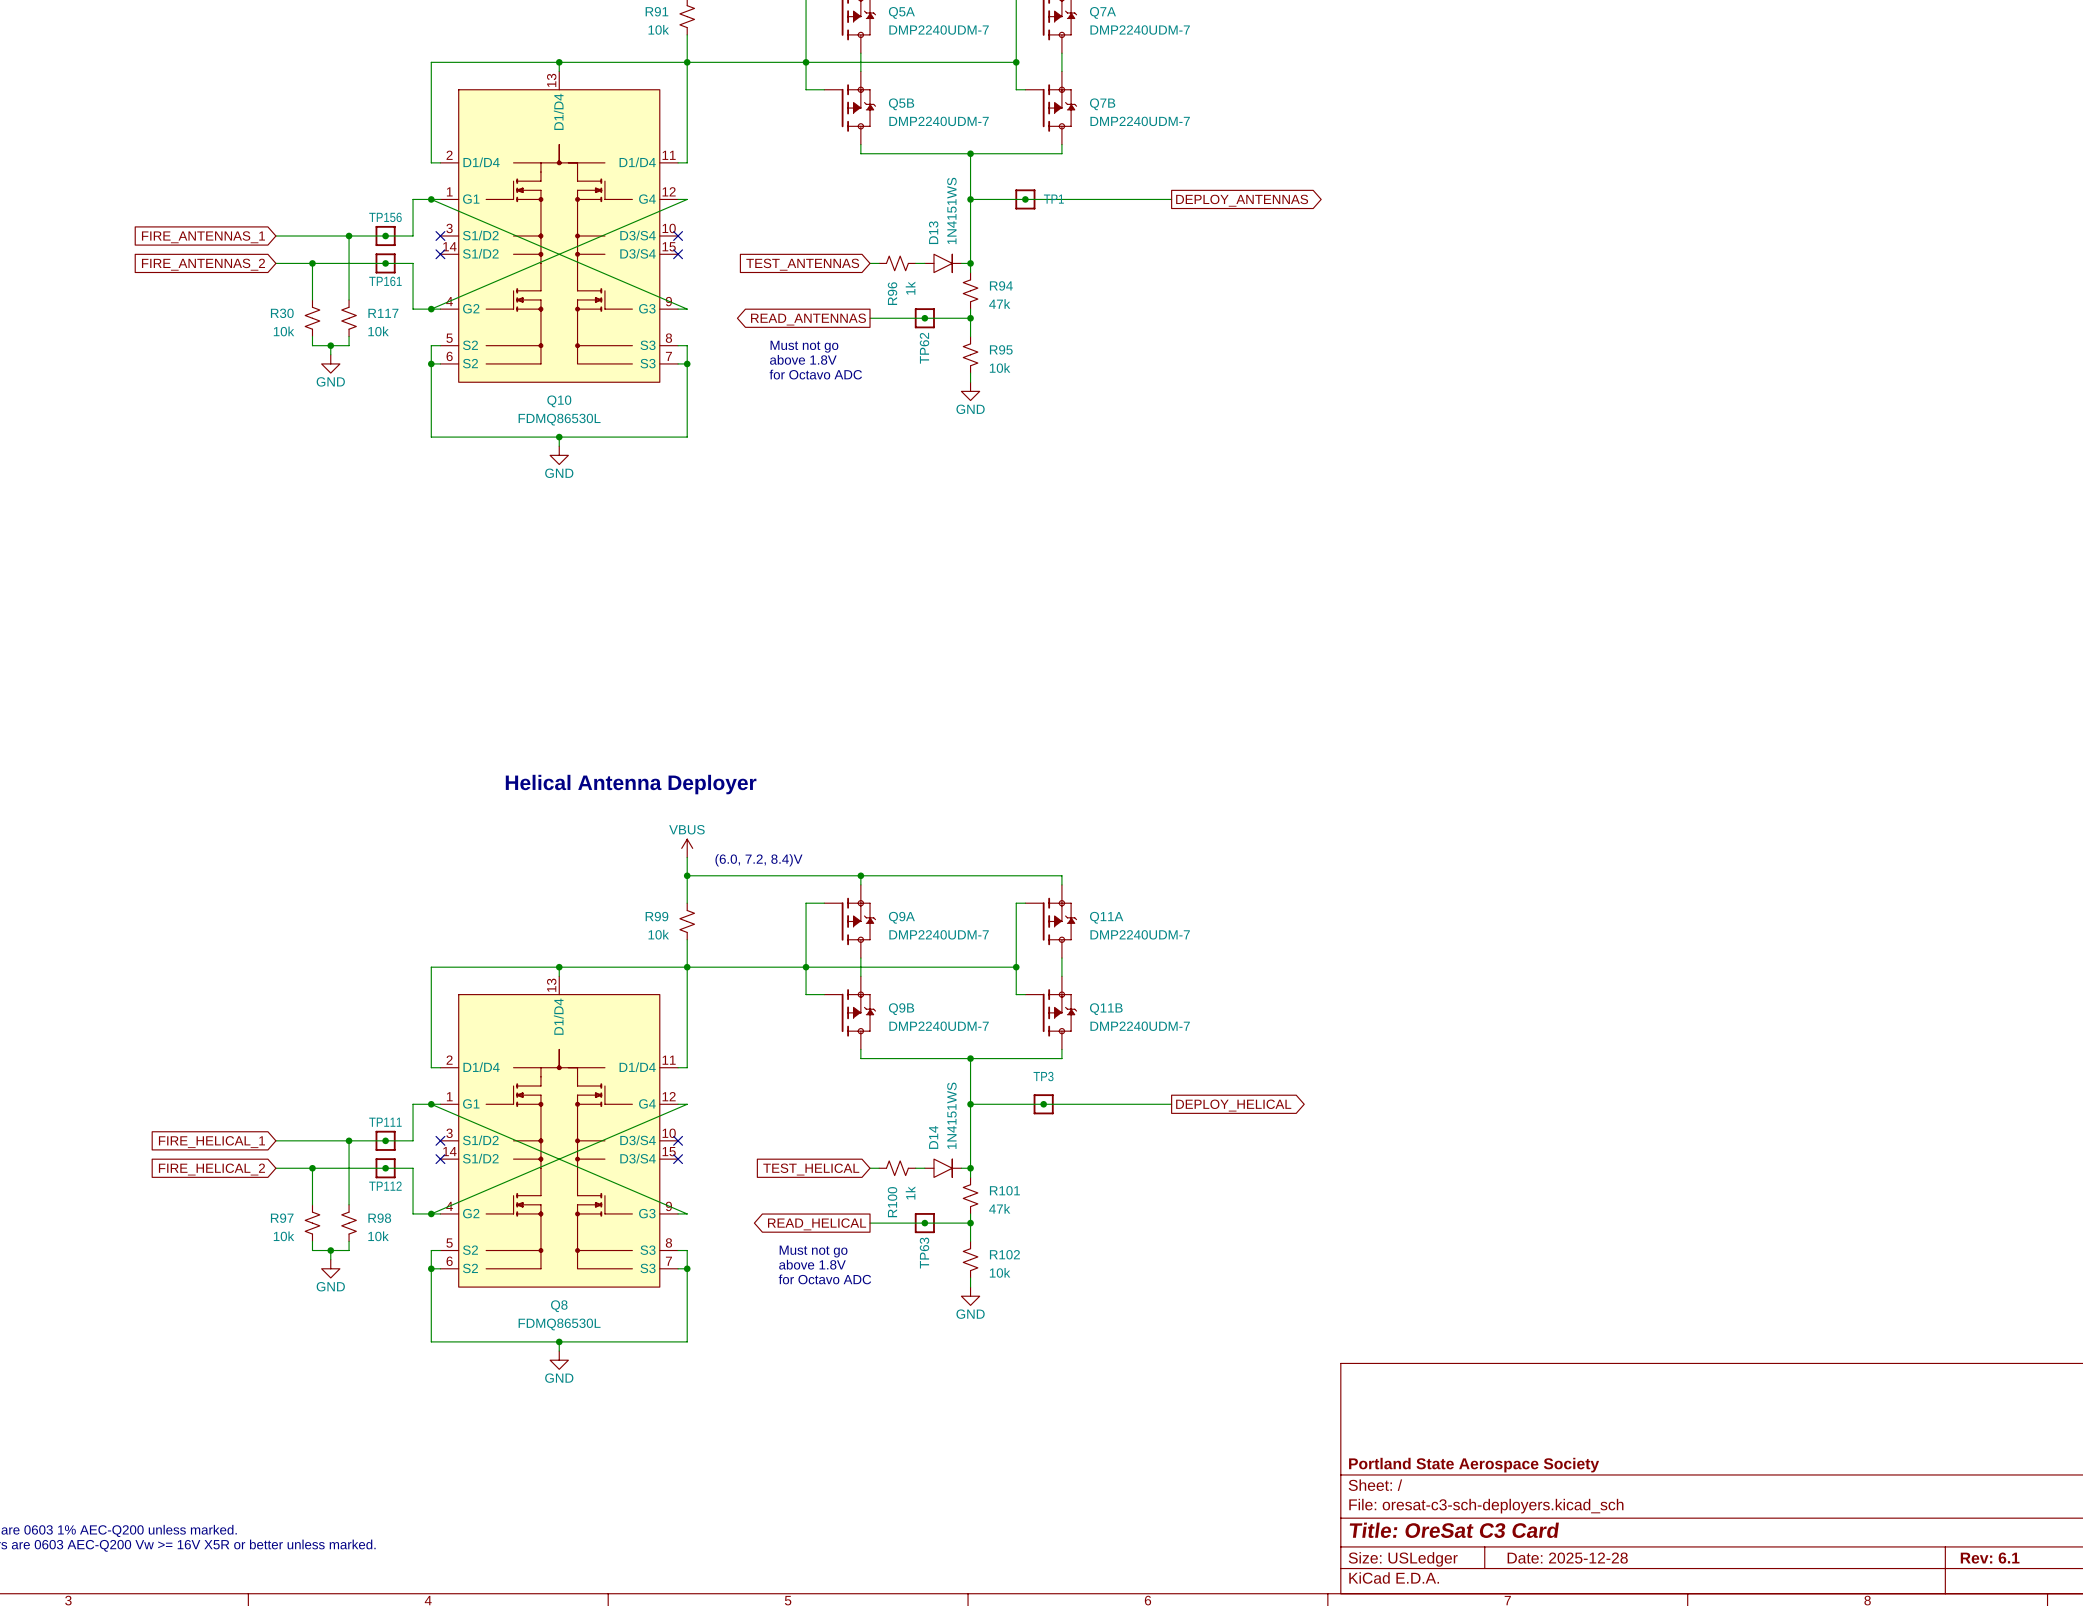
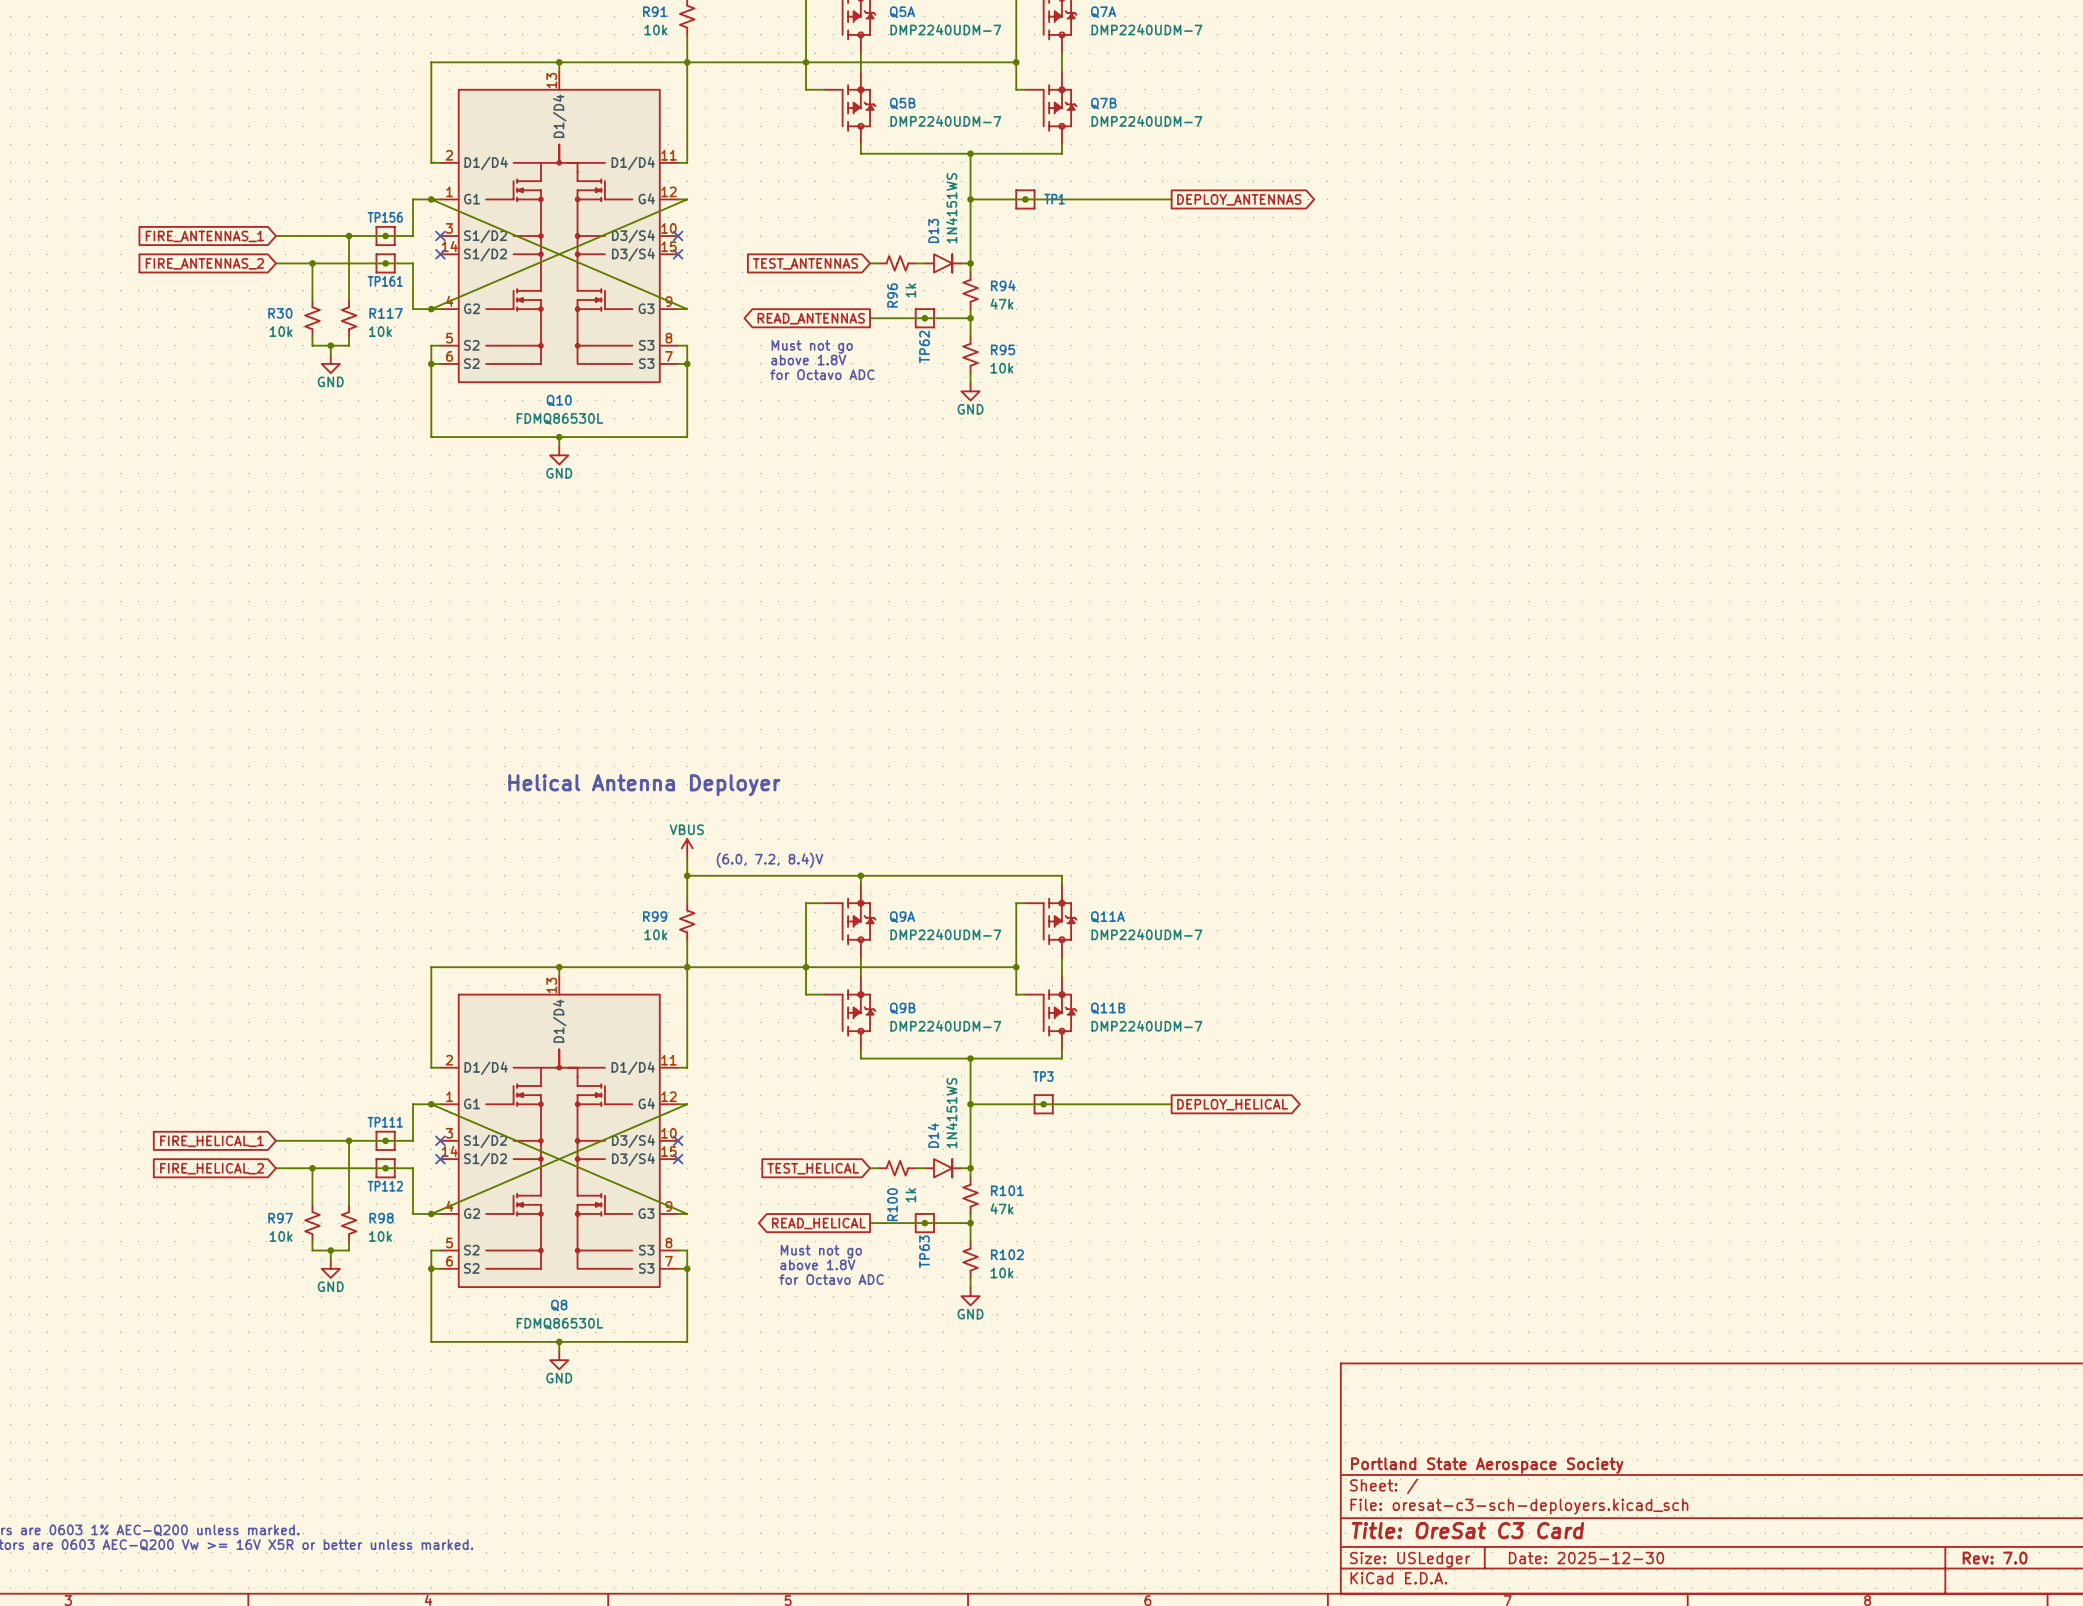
title block: Date: 2025-12-28 (1567, 1558) -> Date: 2025-12-30 (1586, 1558)
title block: Rev: 6.1 (1990, 1558) -> Rev: 7.0 (1995, 1558)

